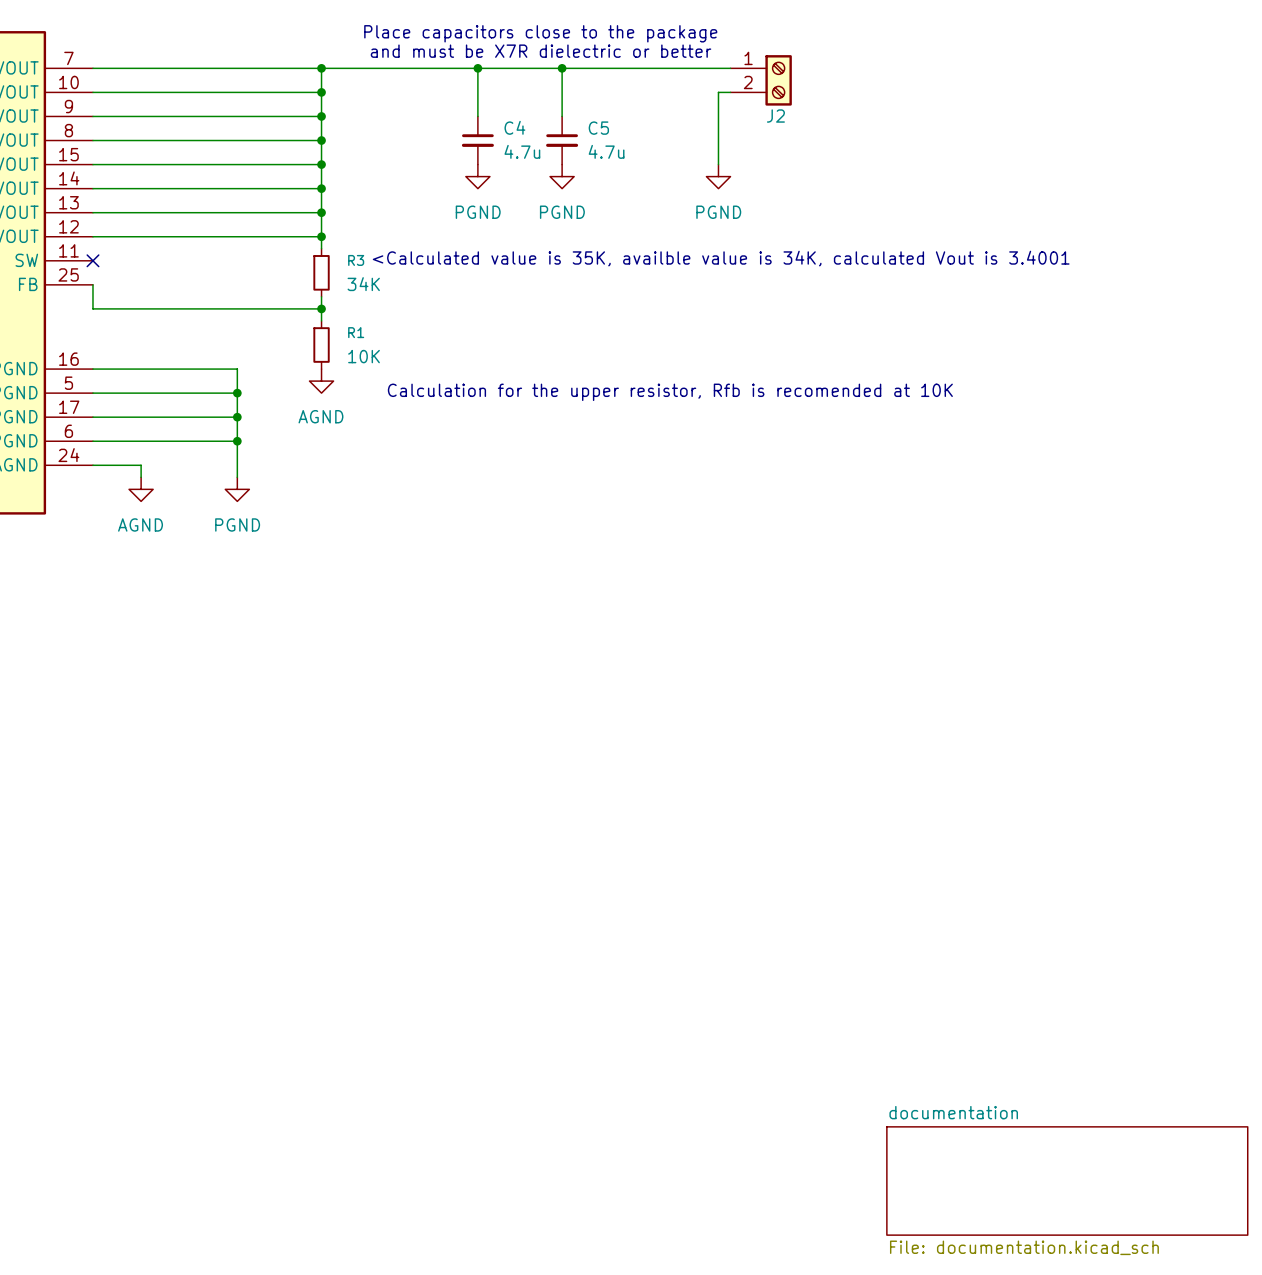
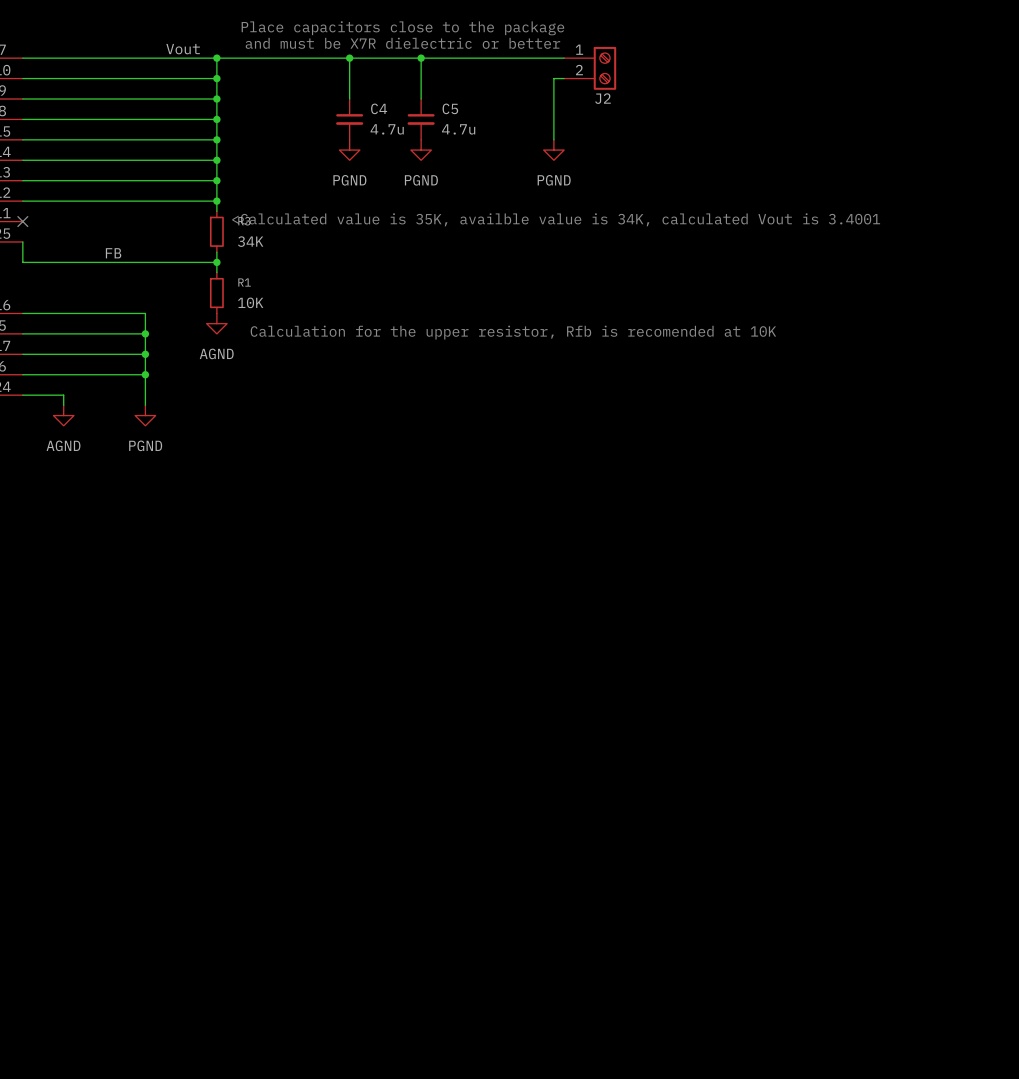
label: none -> Vout (183, 49)
label: none -> FB (113, 253)
sheet documentation: File: documentation.kicad_sch (1067, 1180) -> none

